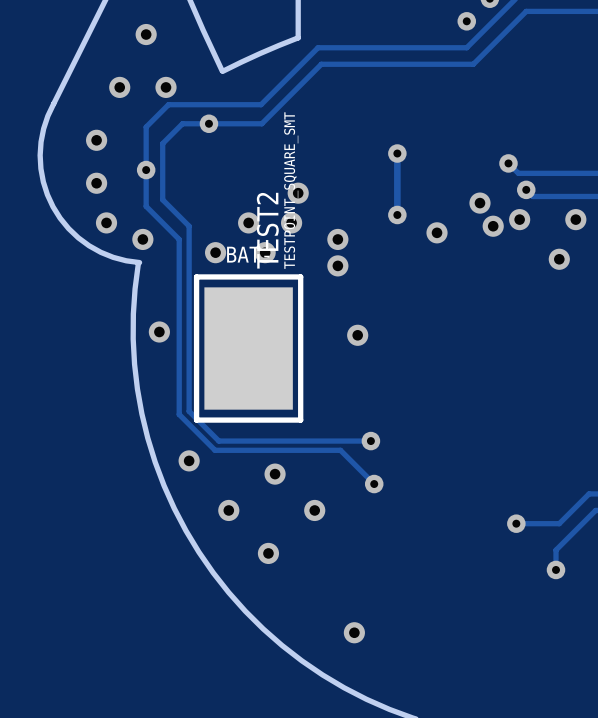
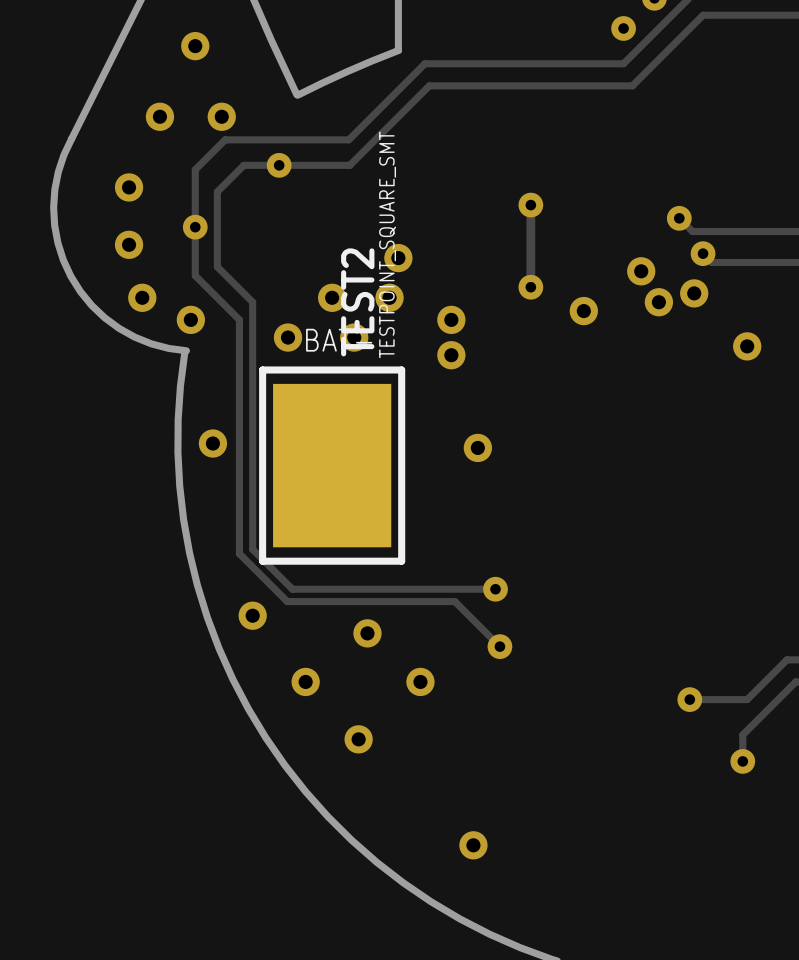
via: (575, 219) -> none

